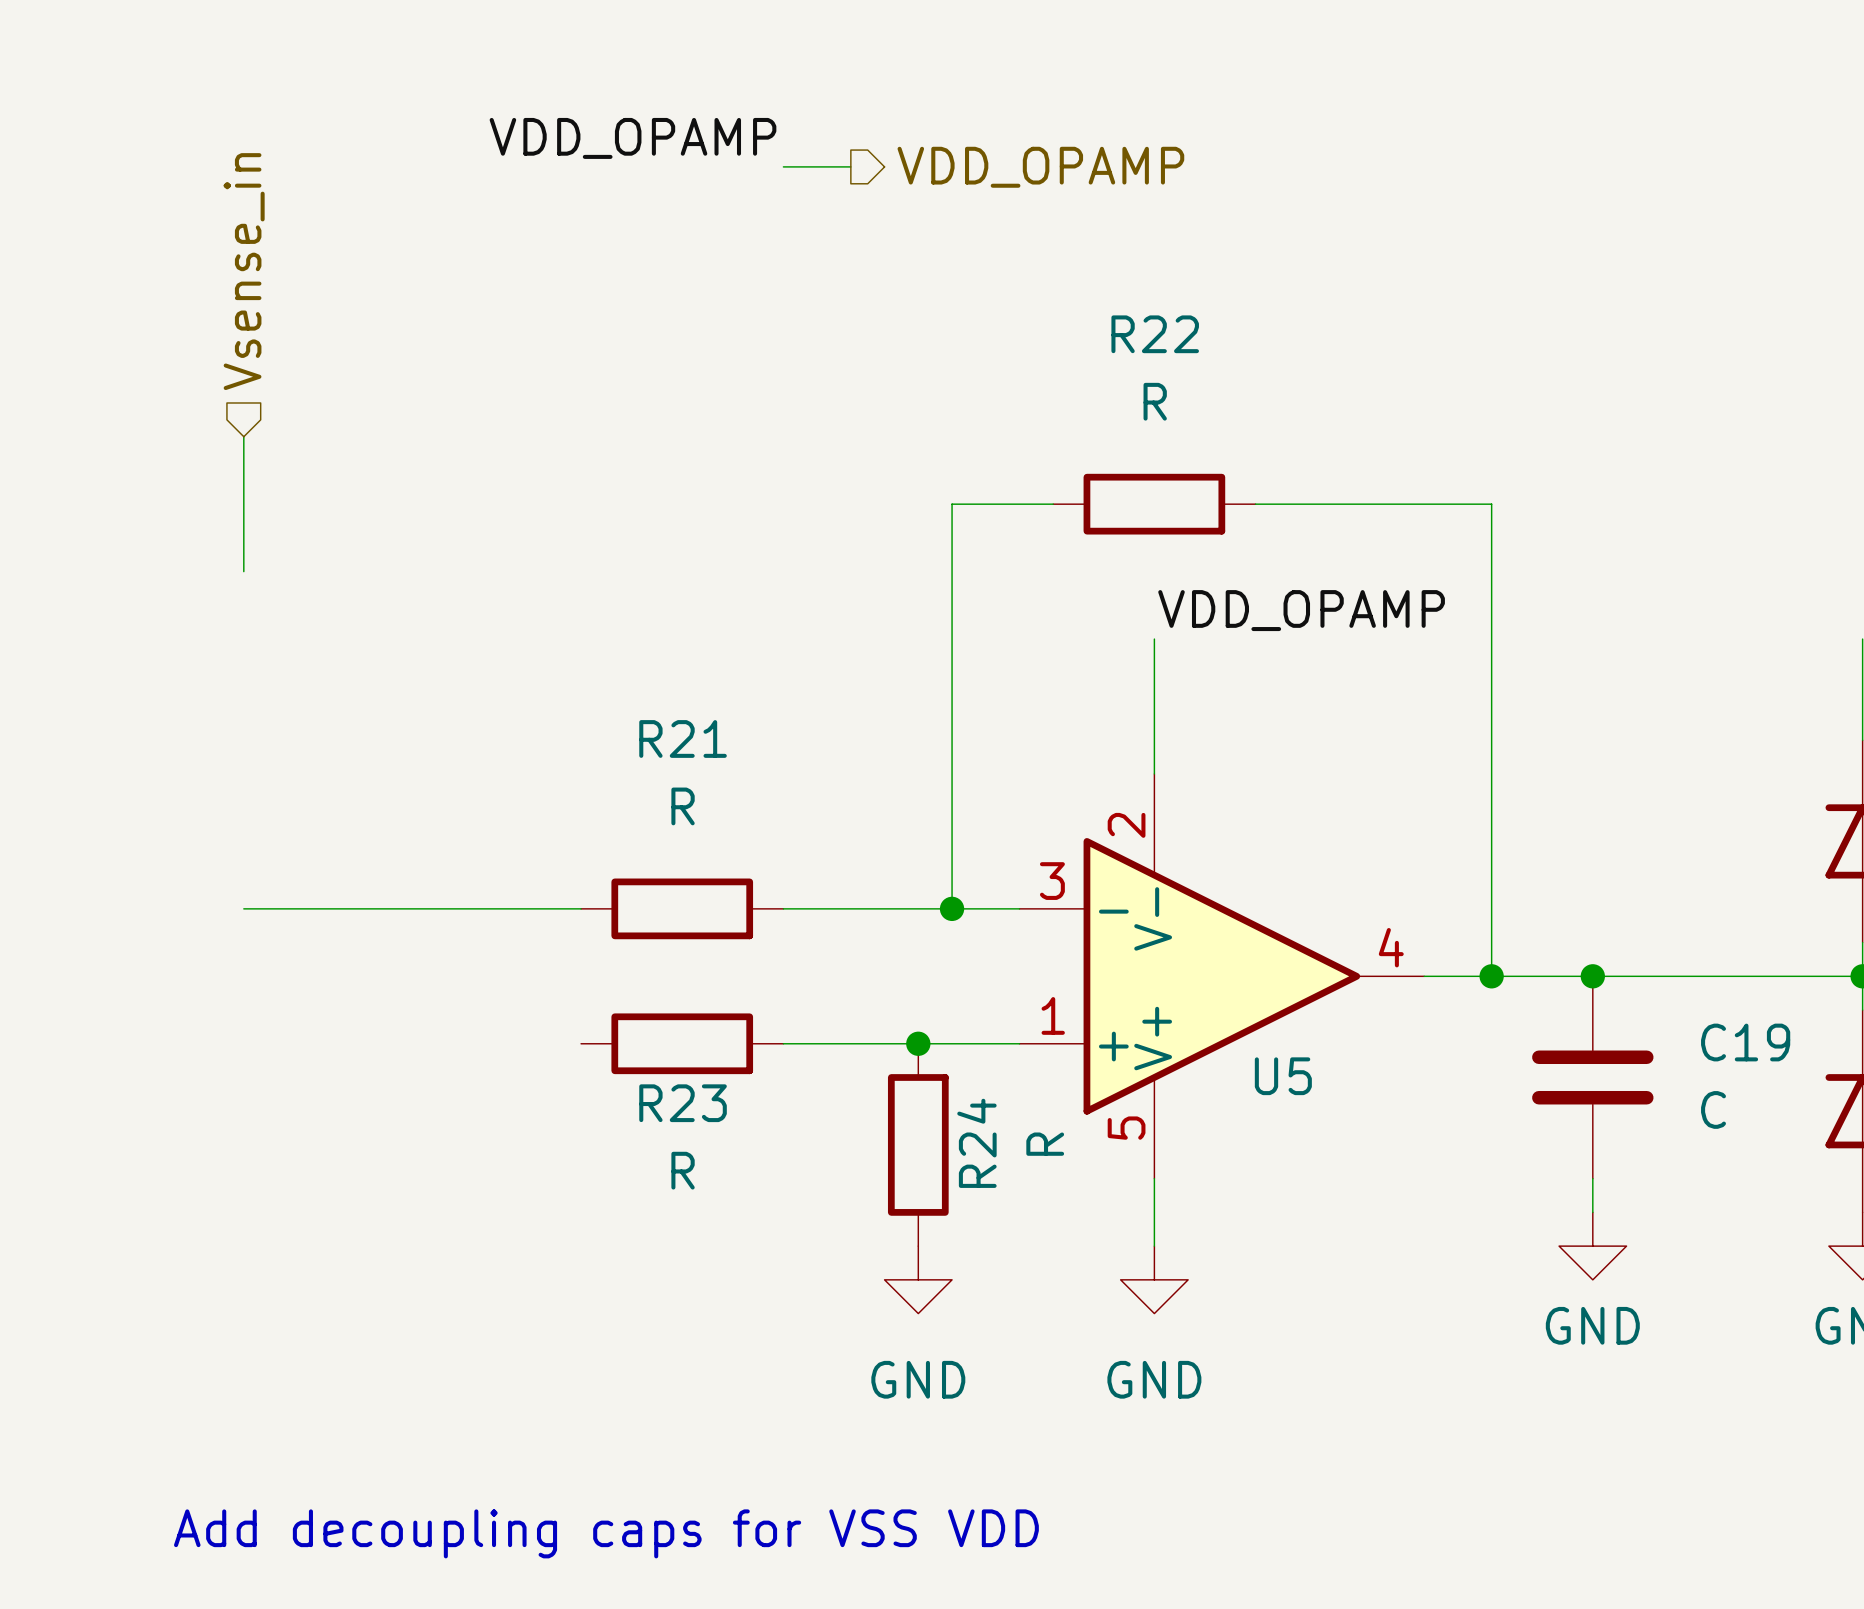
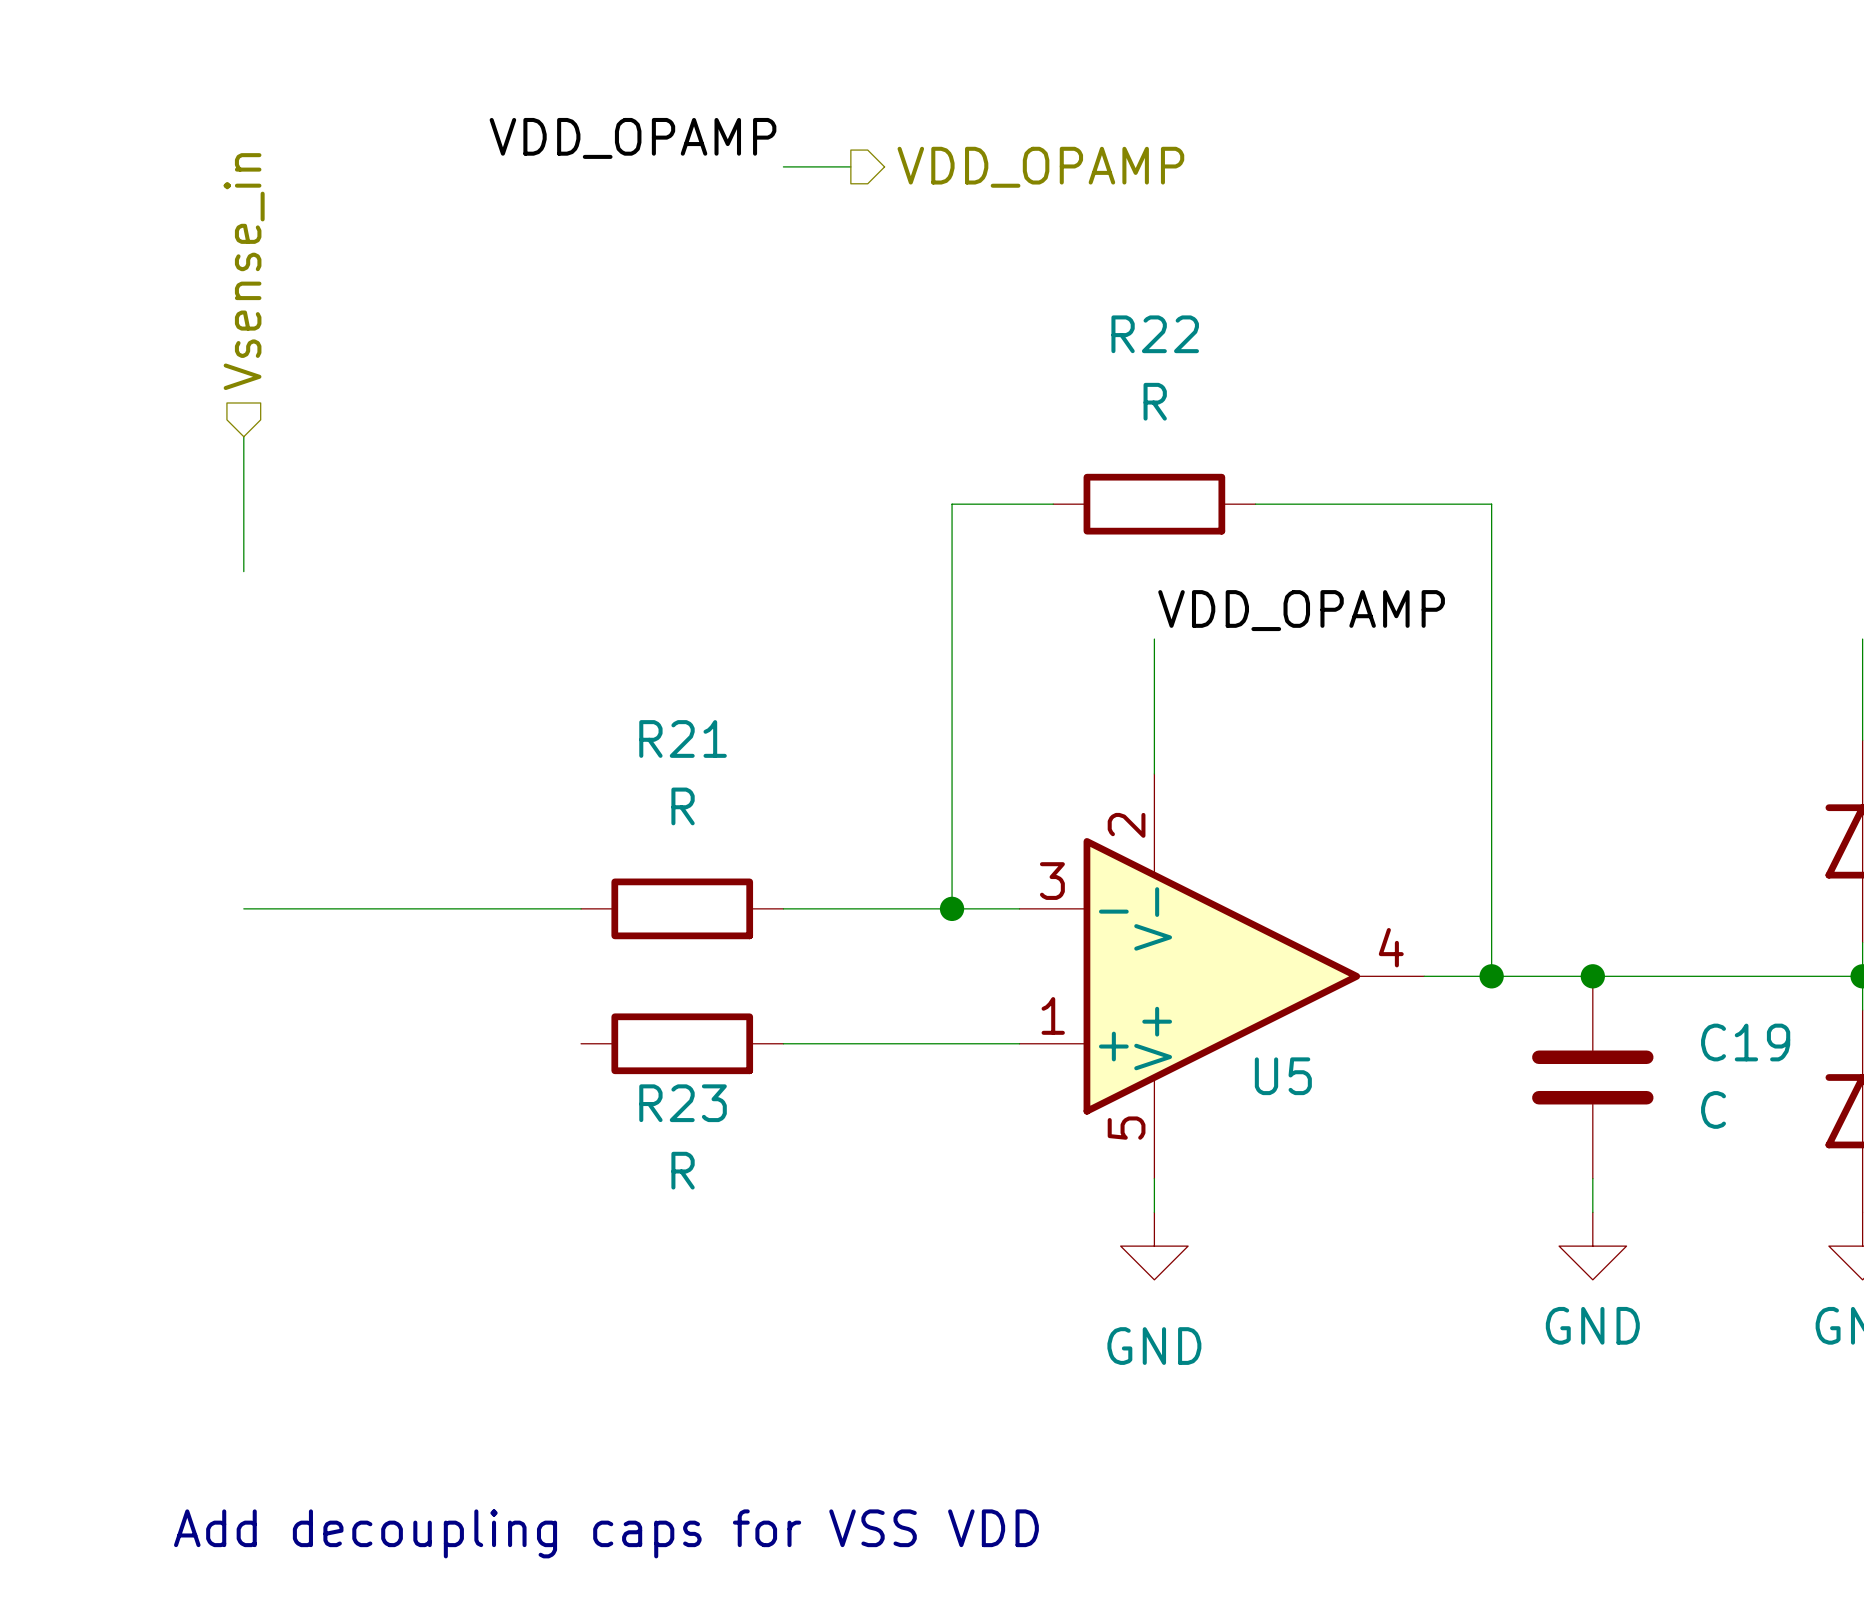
junction: (918, 1043) -> none
R24: R (918, 1144) -> none
power symbol: GND (918, 1279) -> none
power symbol position: GND (1154, 1279) -> GND (1154, 1246)

